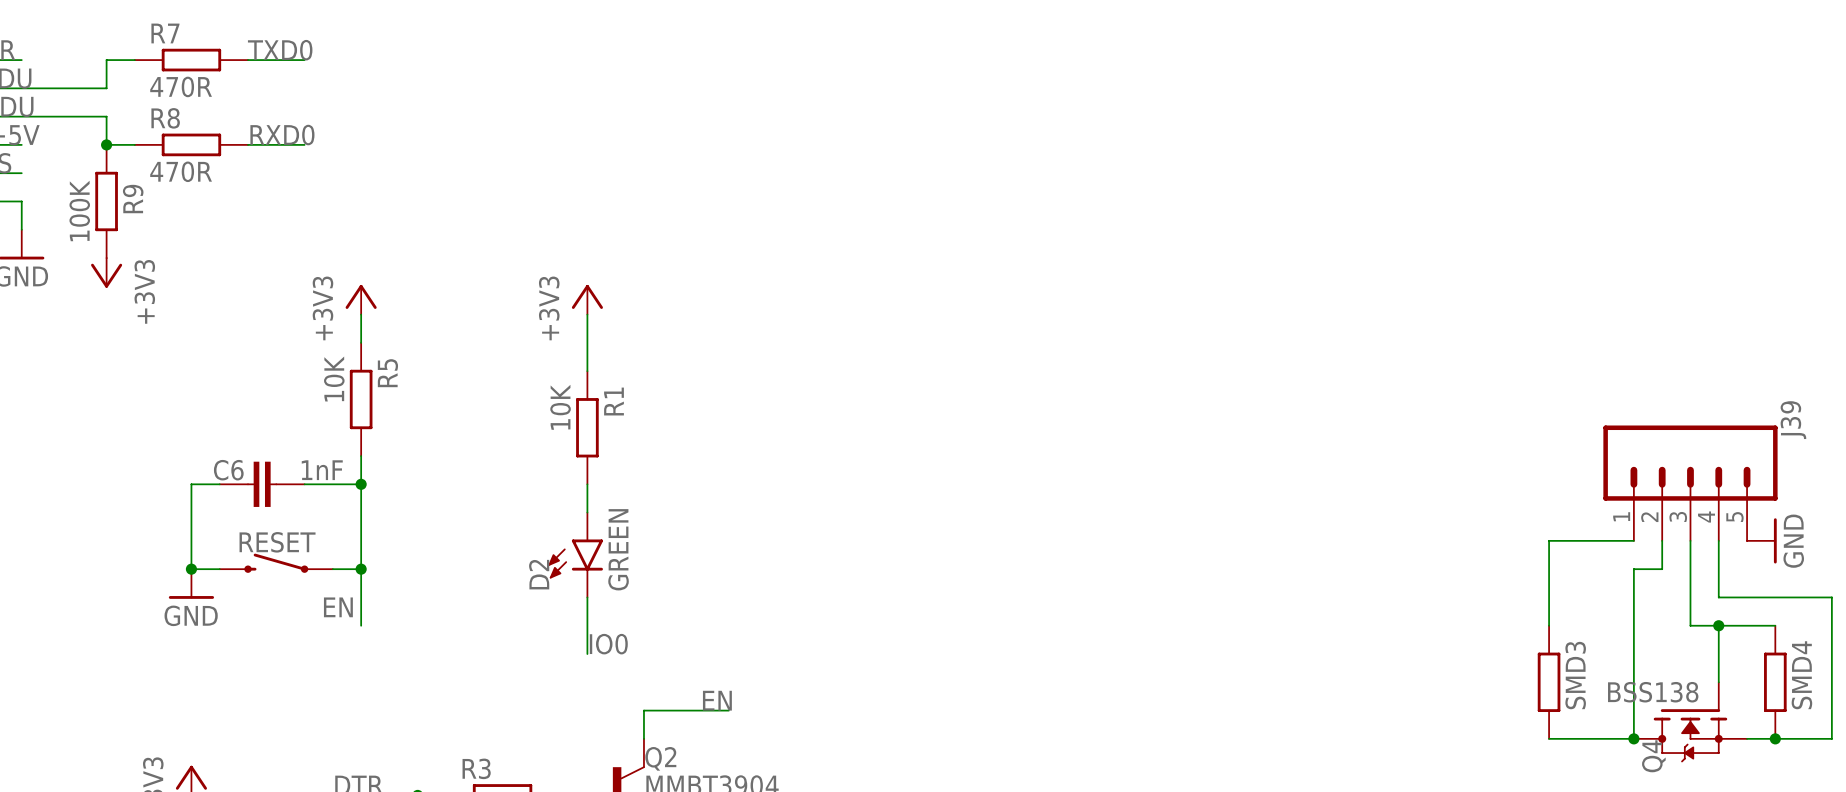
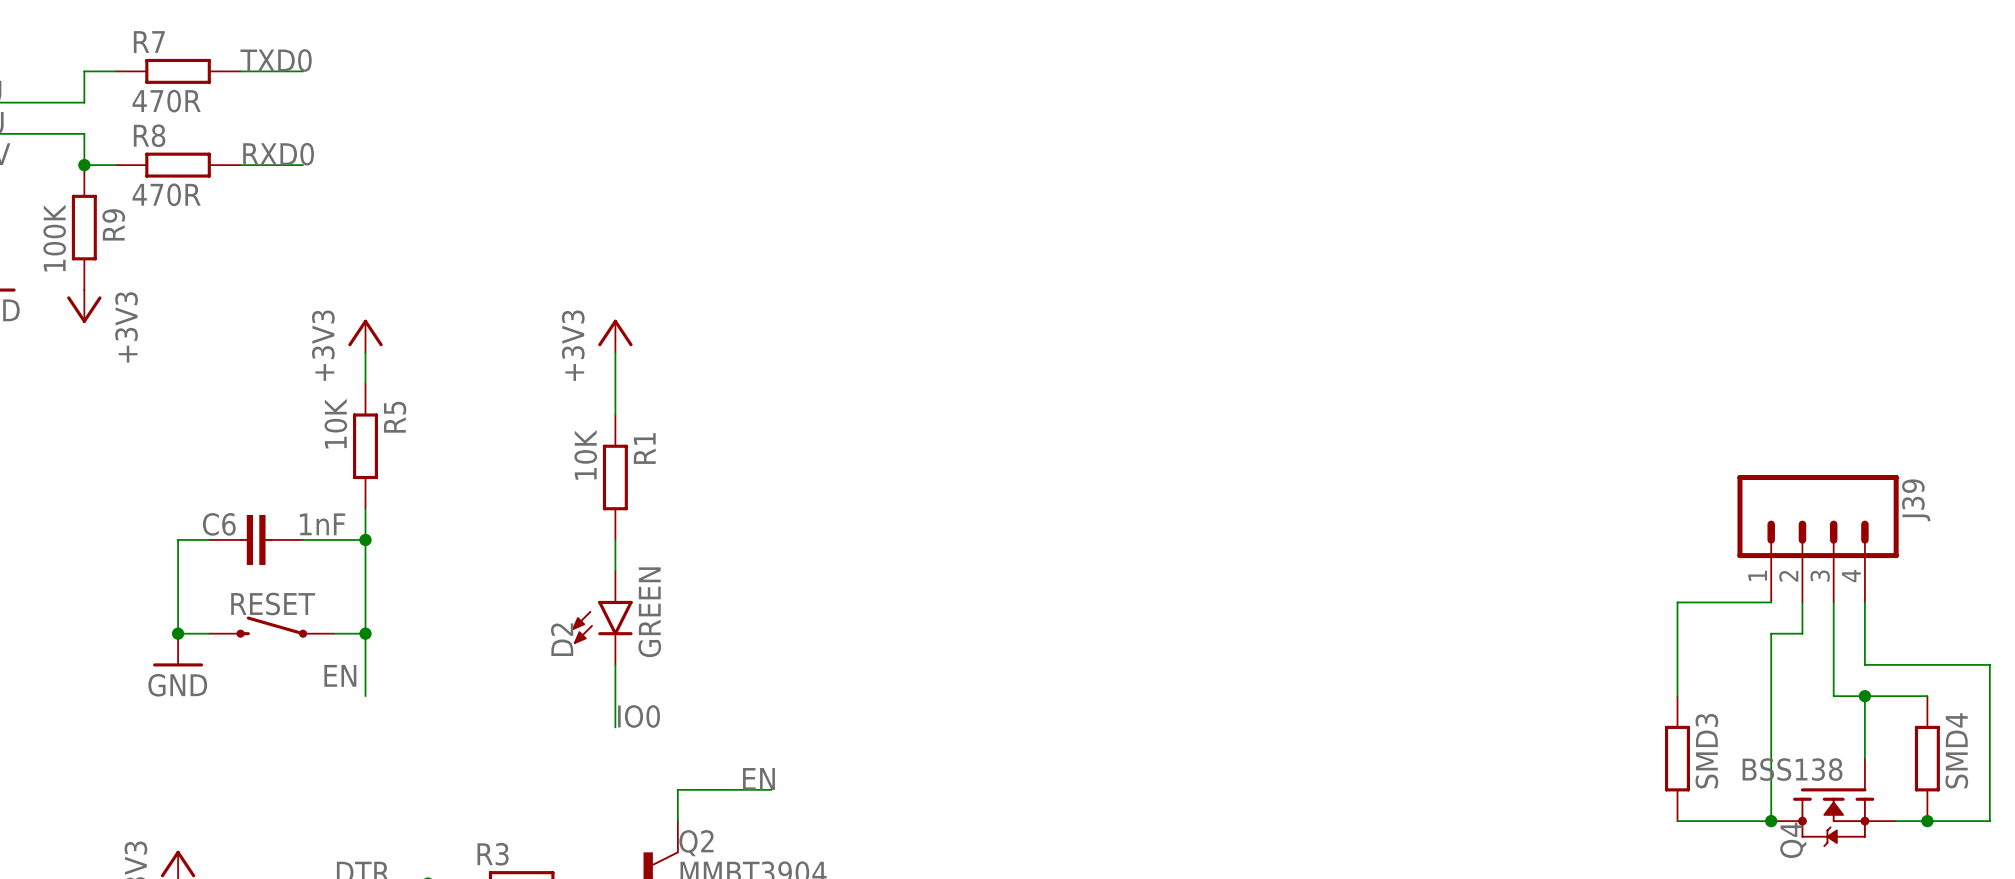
J39 name position: J39 (1793, 420) -> J39 (1916, 500)
J39 symbol: [1603, 425, 1778, 541] -> [1737, 474, 1899, 603]
power symbol: GND (1761, 540) -> none

